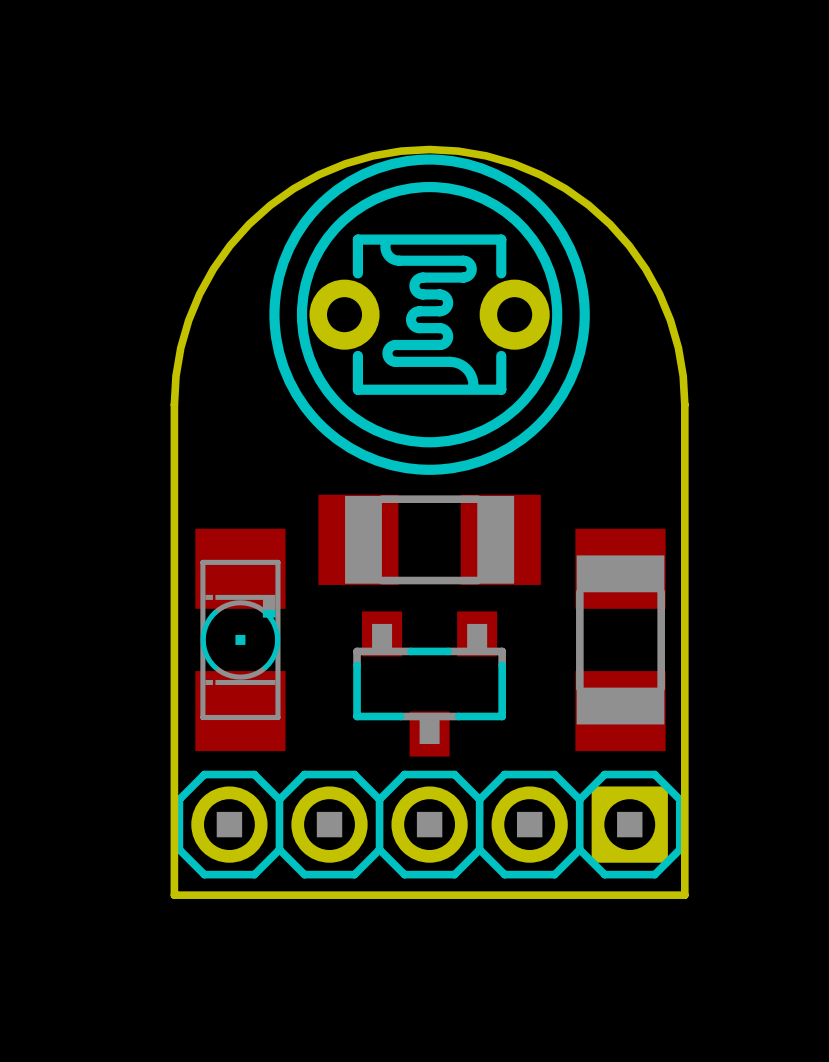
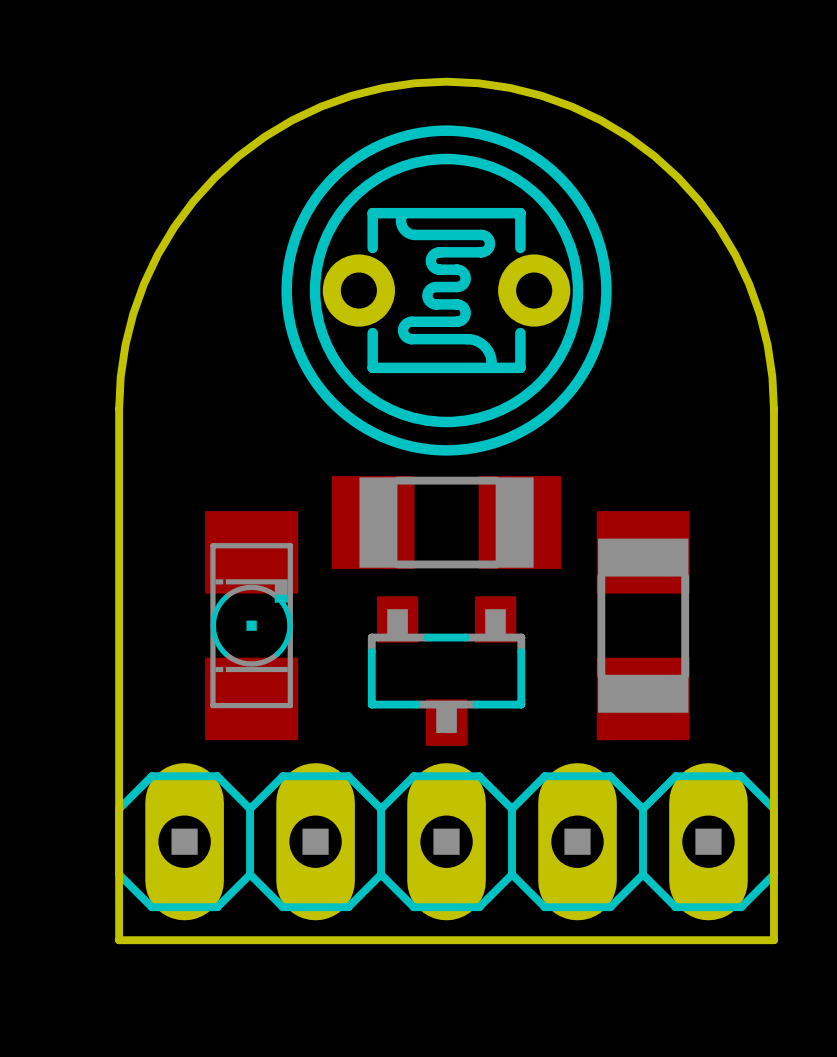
board edge: (174, 404) (174, 895) (684, 895) (684, 404) (683, 376) (678, 347) (670, 320) (659, 294) (645, 268) (629, 245) (610, 224) (588, 205) (565, 188) (540, 174) (513, 163) (486, 155) (458, 151) (429, 149) (401, 151) (372, 155) (345, 163) (318, 174) (293, 188) (270, 205) (249, 224) (230, 245) (213, 268) (199, 294) (188, 320) (180, 347) (175, 376) (174, 404) -> (119, 409) (119, 940) (773, 940) (773, 409) (772, 377) (767, 345) (759, 314) (749, 283) (735, 254) (718, 227) (699, 201) (678, 177) (654, 156) (628, 136) (600, 120) (571, 106) (541, 95) (510, 87) (478, 83) (446, 81) (414, 83) (382, 87) (351, 95) (321, 106) (292, 120) (264, 136) (238, 156) (215, 177) (193, 201) (174, 227) (157, 254) (144, 283) (133, 314) (125, 345) (120, 377) (119, 409)
part footprint: [175, 770, 684, 879] -> [115, 763, 778, 921]

